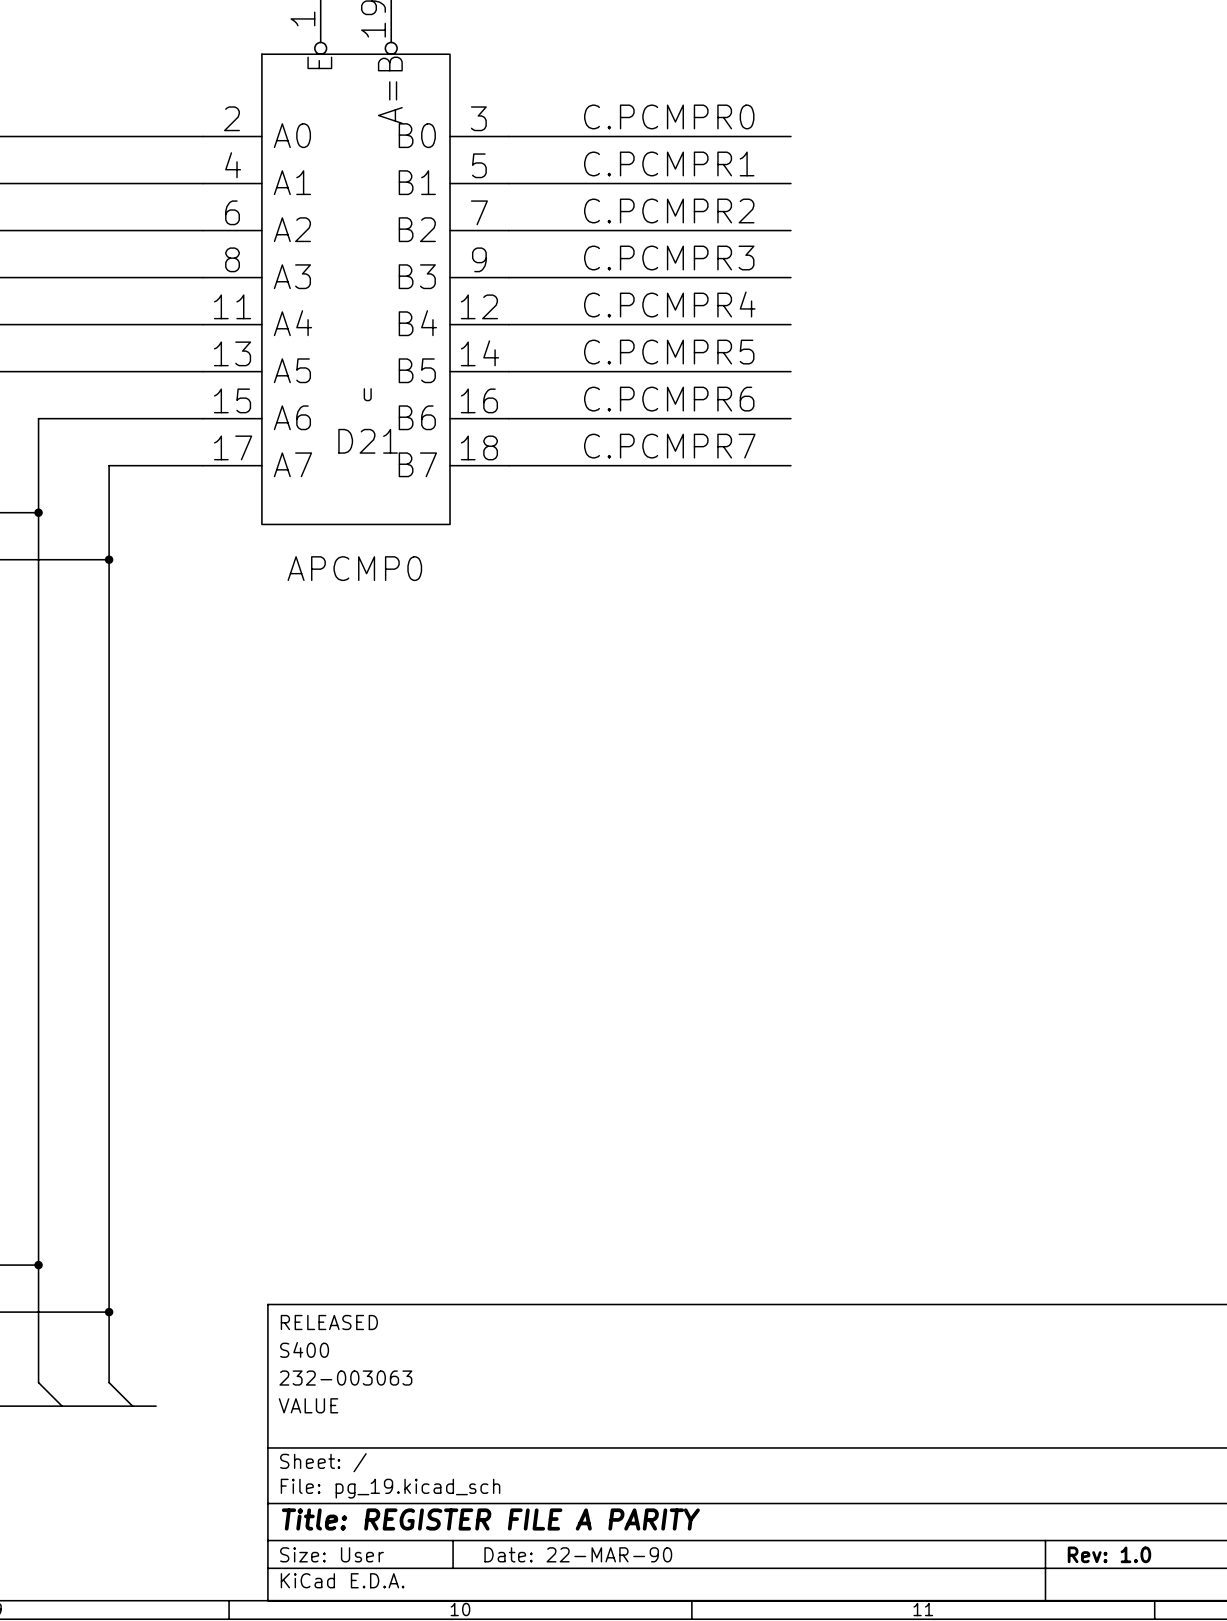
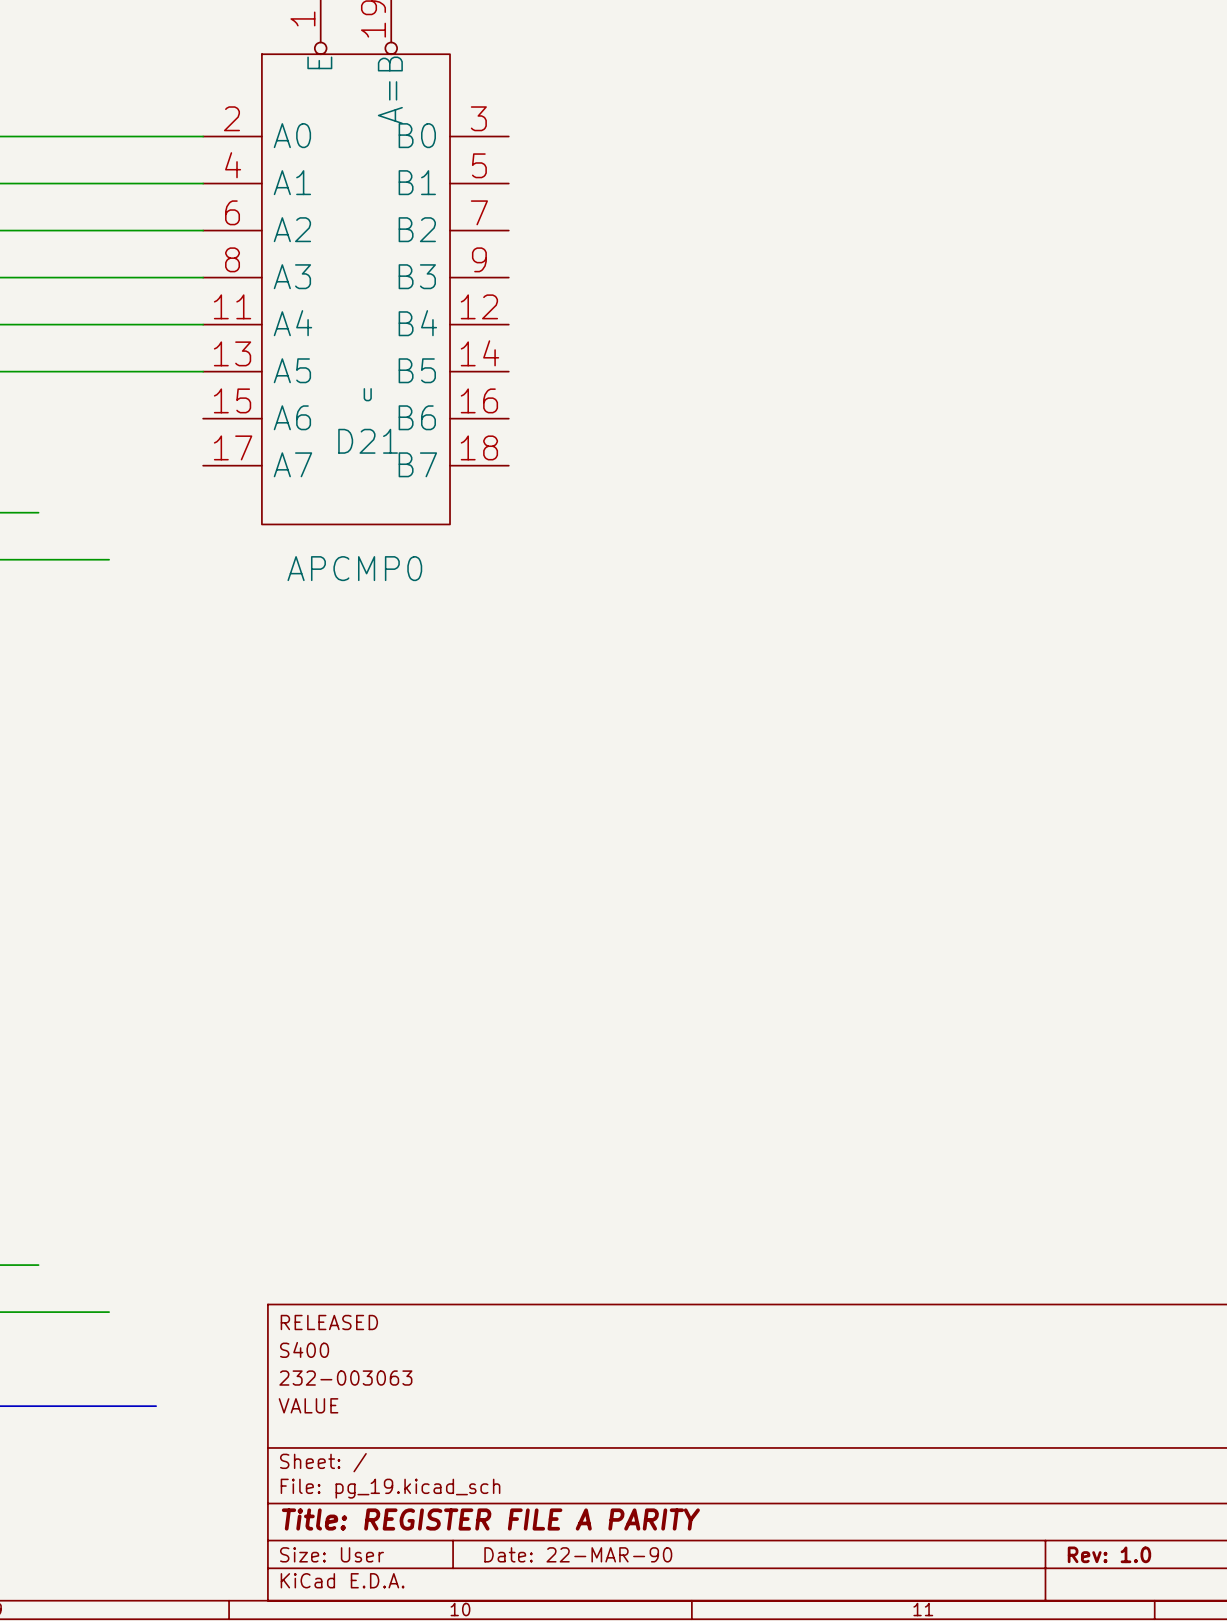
label: C.PCMPR0 (669, 116) -> none
wire: (508, 136) (790, 136) -> none
label: C.PCMPR1 (669, 163) -> none
wire: (508, 183) (790, 183) -> none
label: C.PCMPR2 (669, 210) -> none
wire: (508, 230) (790, 230) -> none
label: C.PCMPR3 (669, 258) -> none
wire: (508, 277) (790, 277) -> none
label: C.PCMPR4 (669, 304) -> none
wire: (508, 324) (790, 324) -> none
label: C.PCMPR5 (669, 352) -> none
wire: (508, 371) (790, 371) -> none
label: C.PCMPR6 (669, 399) -> none
wire: (203, 418) (38, 418) (38, 1382) (62, 1406) -> none
wire: (508, 418) (790, 418) -> none
label: C.PCMPR7 (669, 446) -> none
wire: (203, 465) (109, 465) (109, 1382) (132, 1406) -> none
wire: (508, 465) (790, 465) -> none
junction: (38, 512) -> none
junction: (109, 559) -> none
junction: (38, 1265) -> none
junction: (109, 1312) -> none

